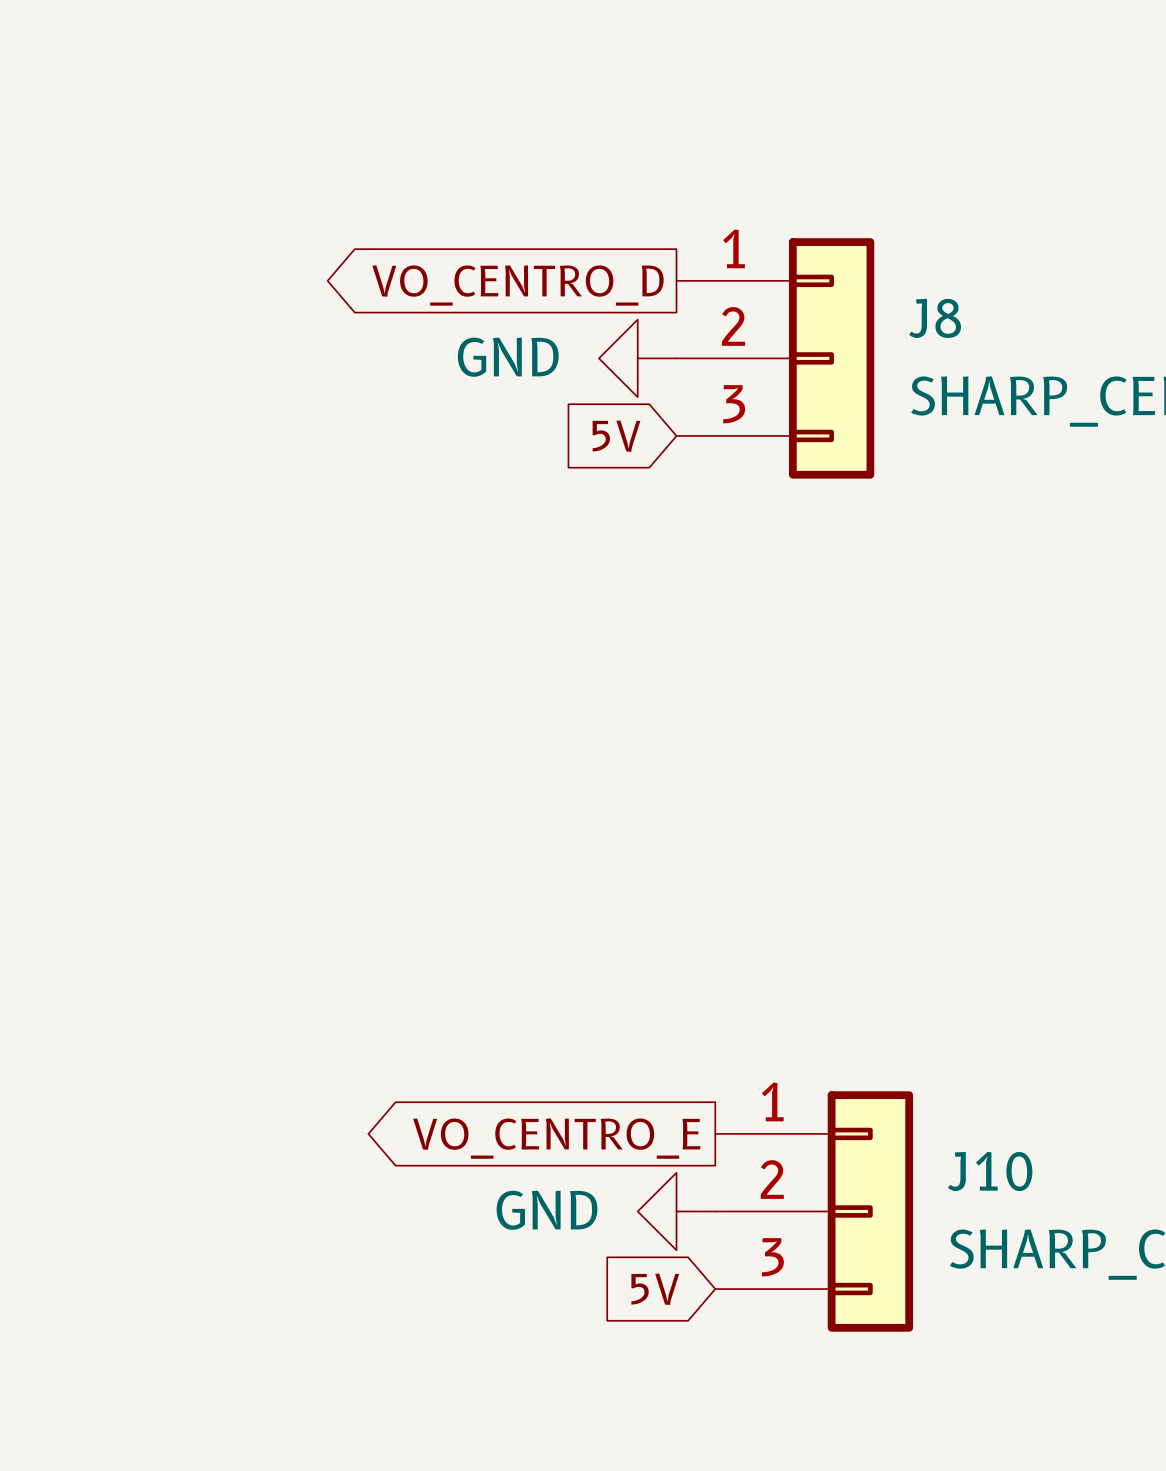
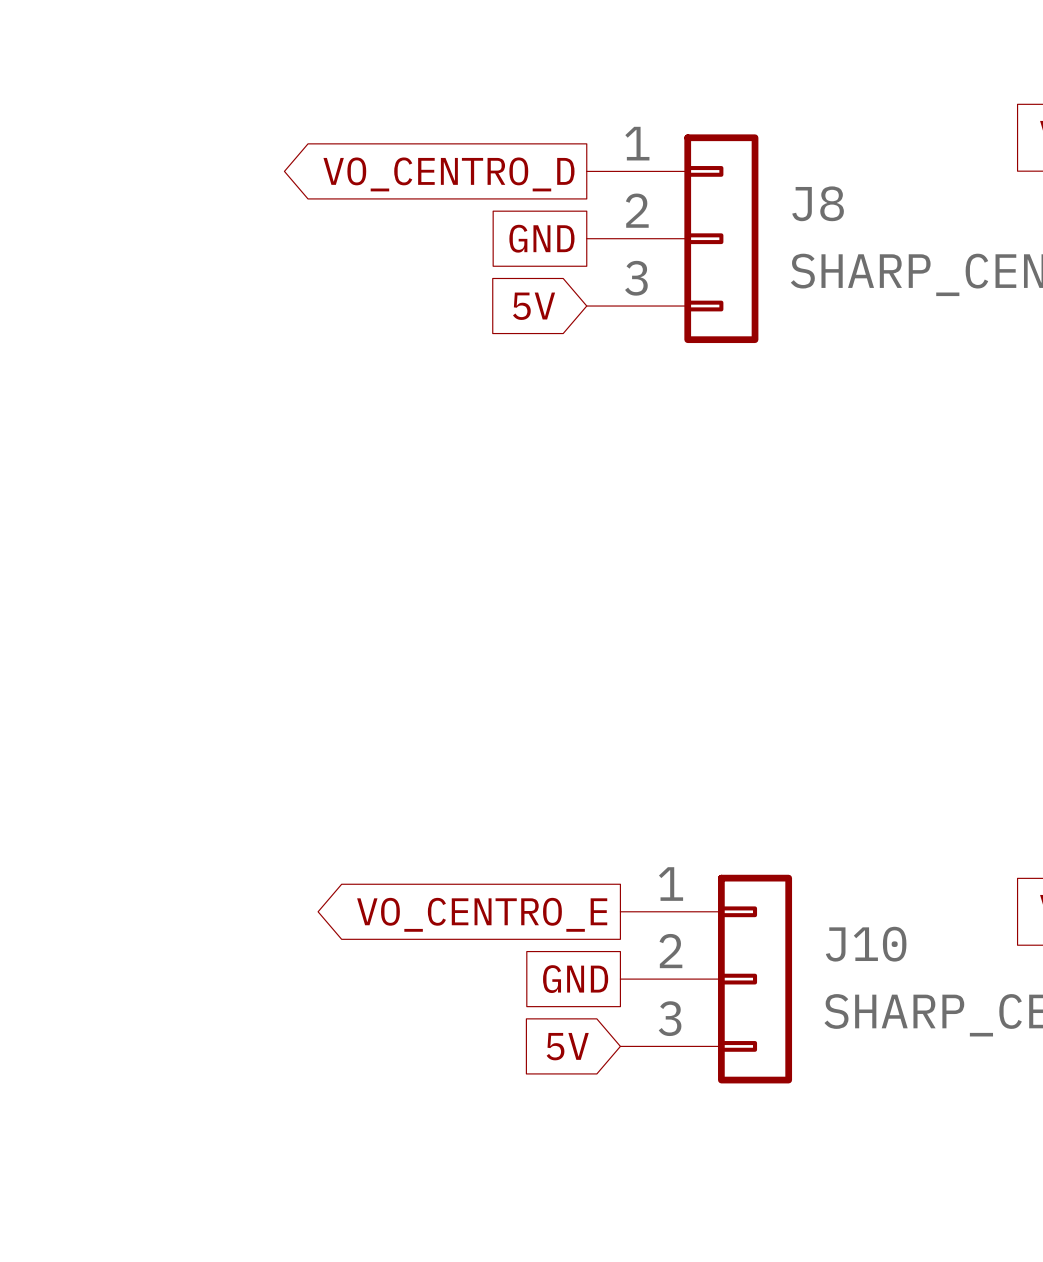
global label: none -> GND (541, 238)
power symbol: GND (637, 358) -> none
global label: none -> GND (575, 979)
power symbol: GND (676, 1211) -> none

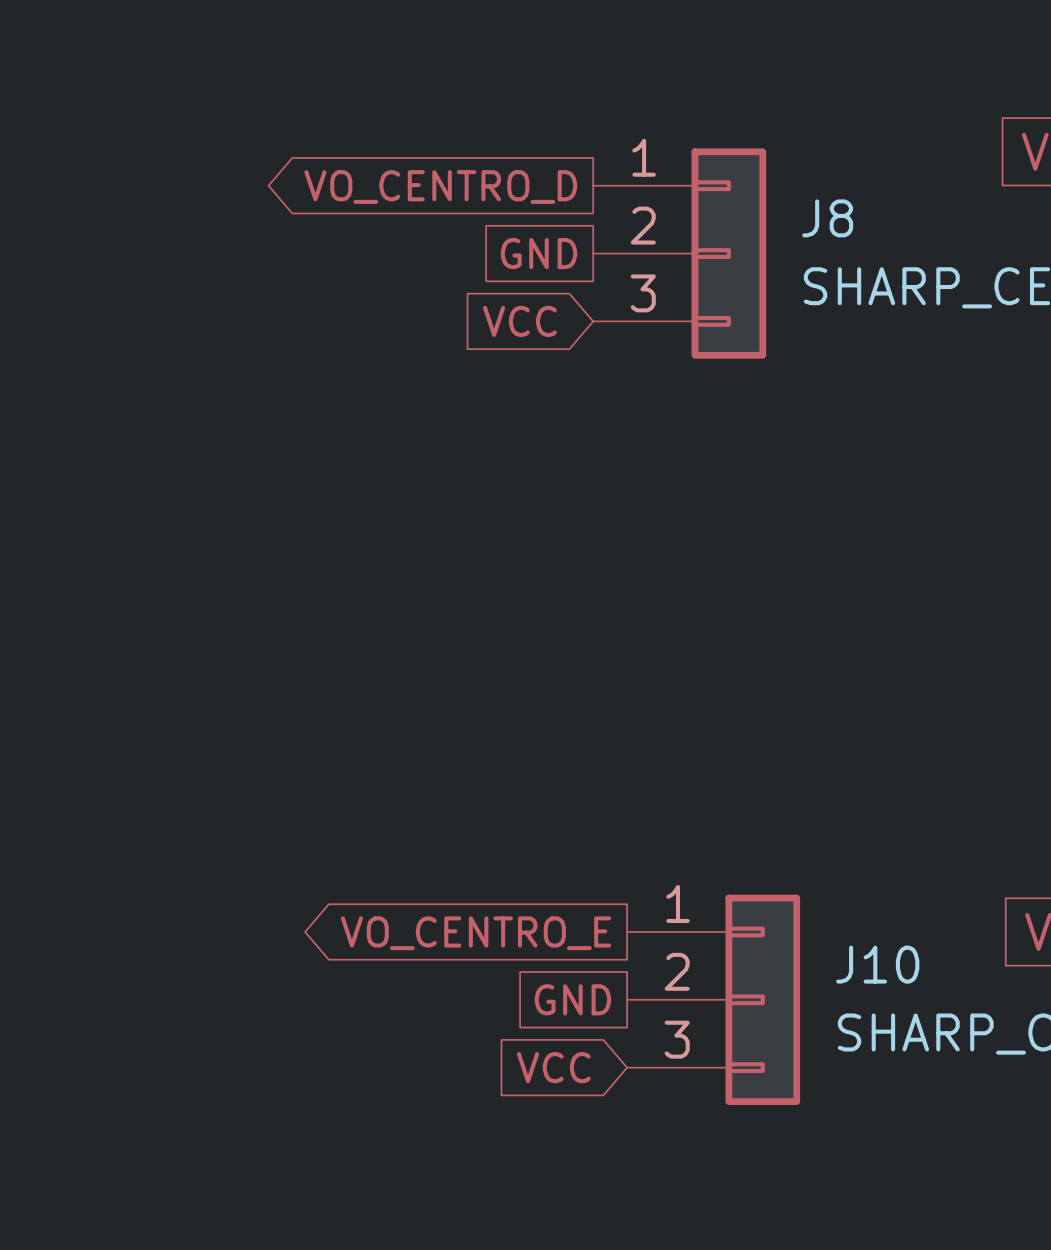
global label: 5V (534, 306) -> VCC (519, 321)
global label: 5V (567, 1046) -> VCC (553, 1067)

